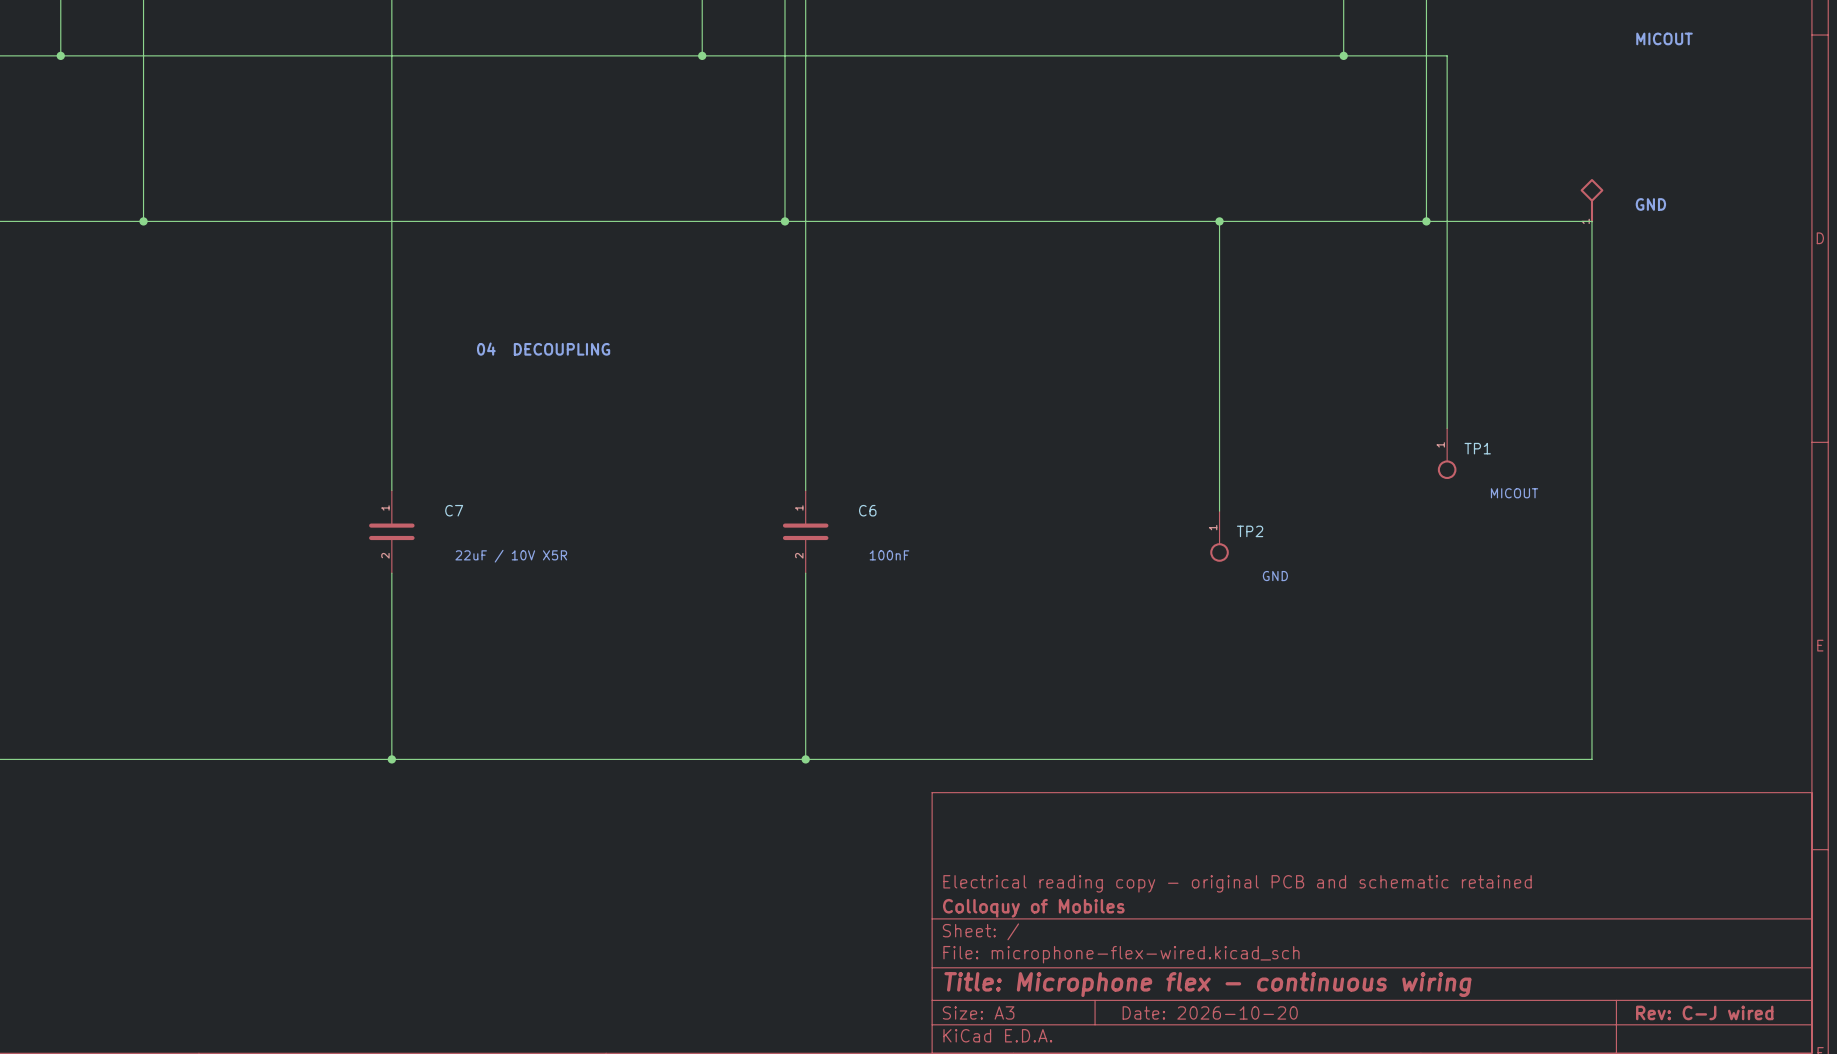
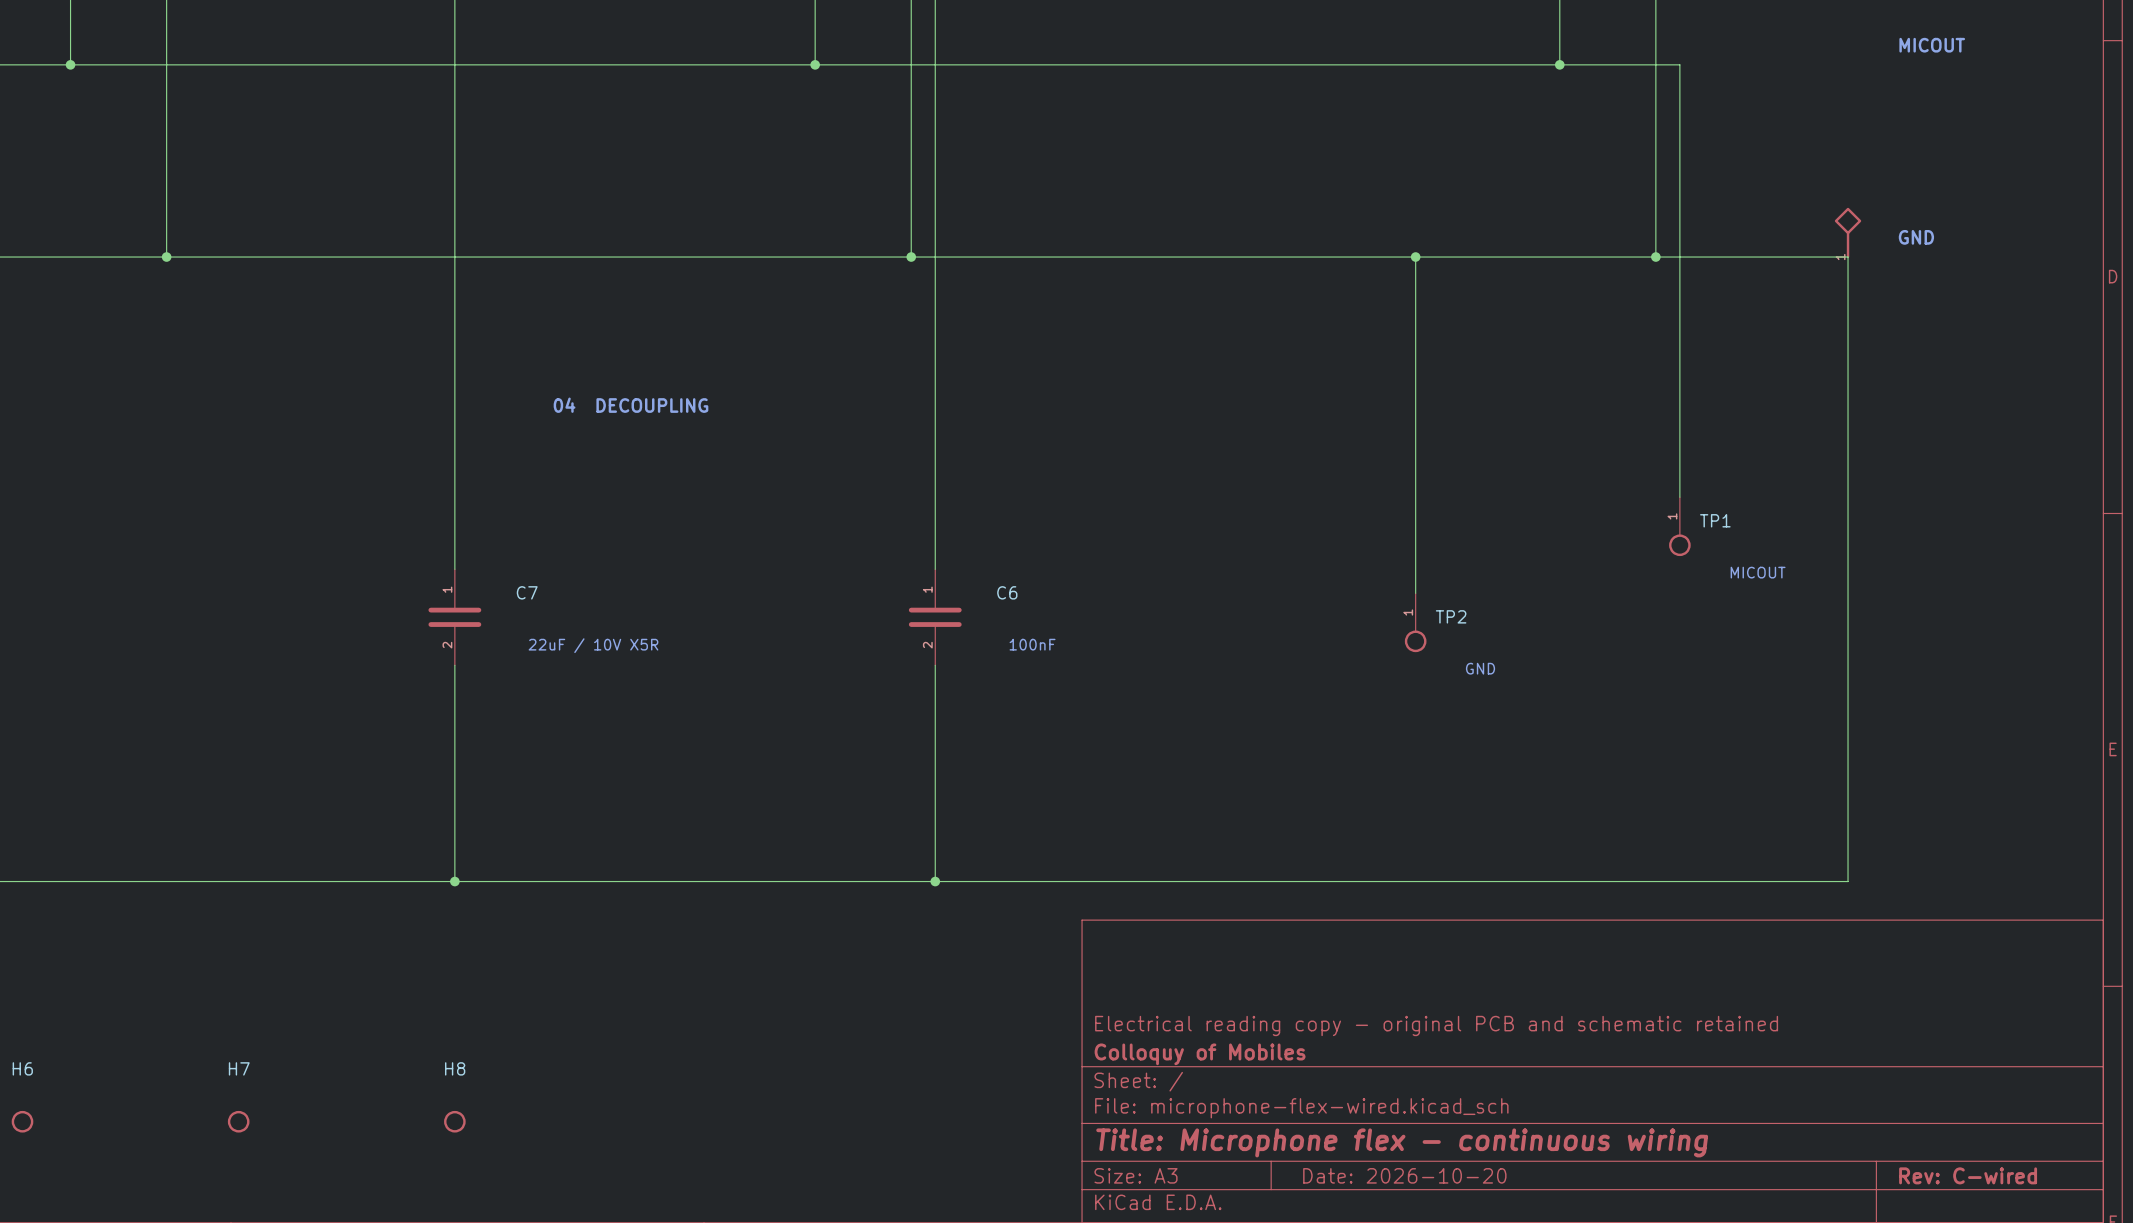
H6: none -> (22, 1121)
H7: none -> (238, 1121)
H8: none -> (454, 1121)
title block: Rev: C-J wired (1704, 1012) -> Rev: C-wired (1968, 1175)

